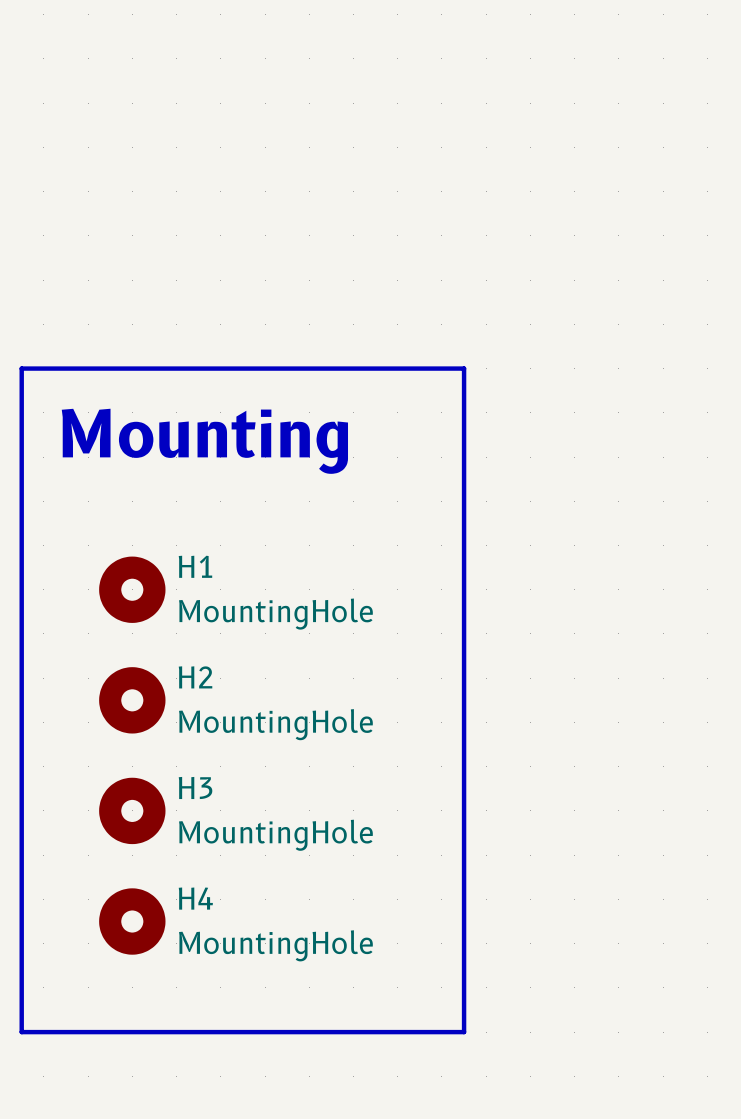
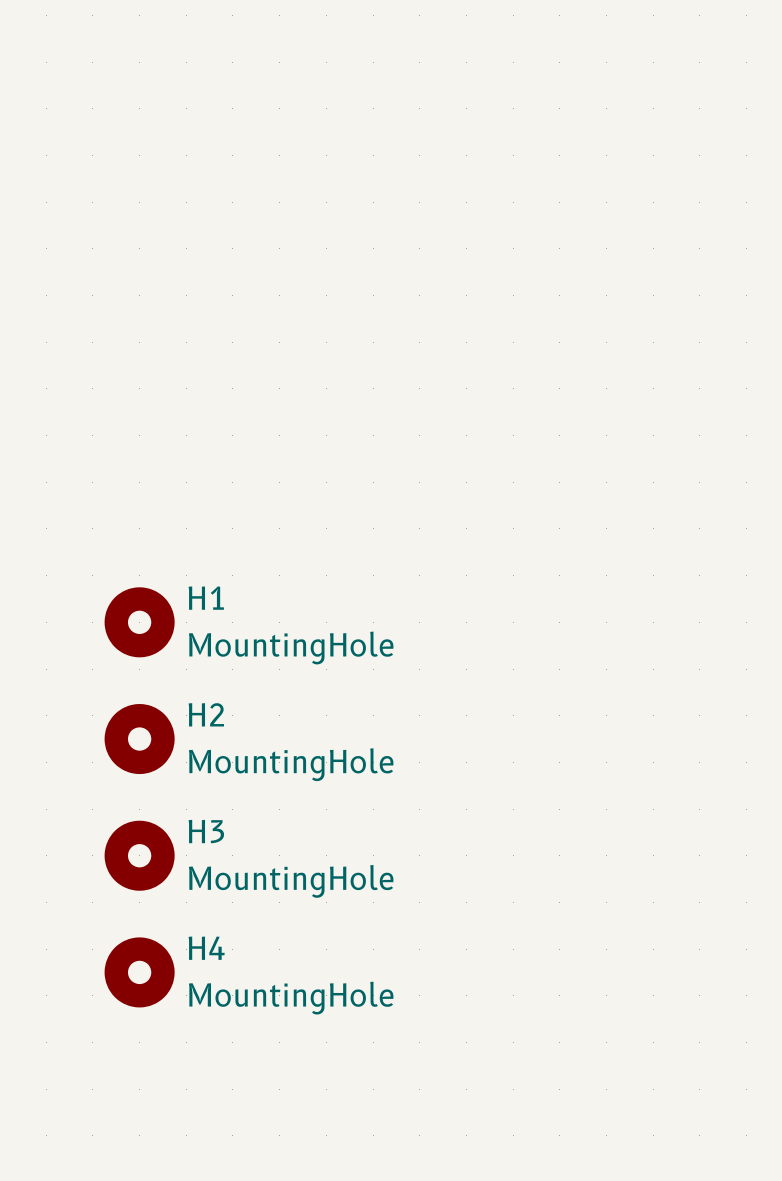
line: (21, 368) (464, 368) (464, 1032) (21, 1032) (21, 368) -> none
text: Mounting (204, 441) -> none

